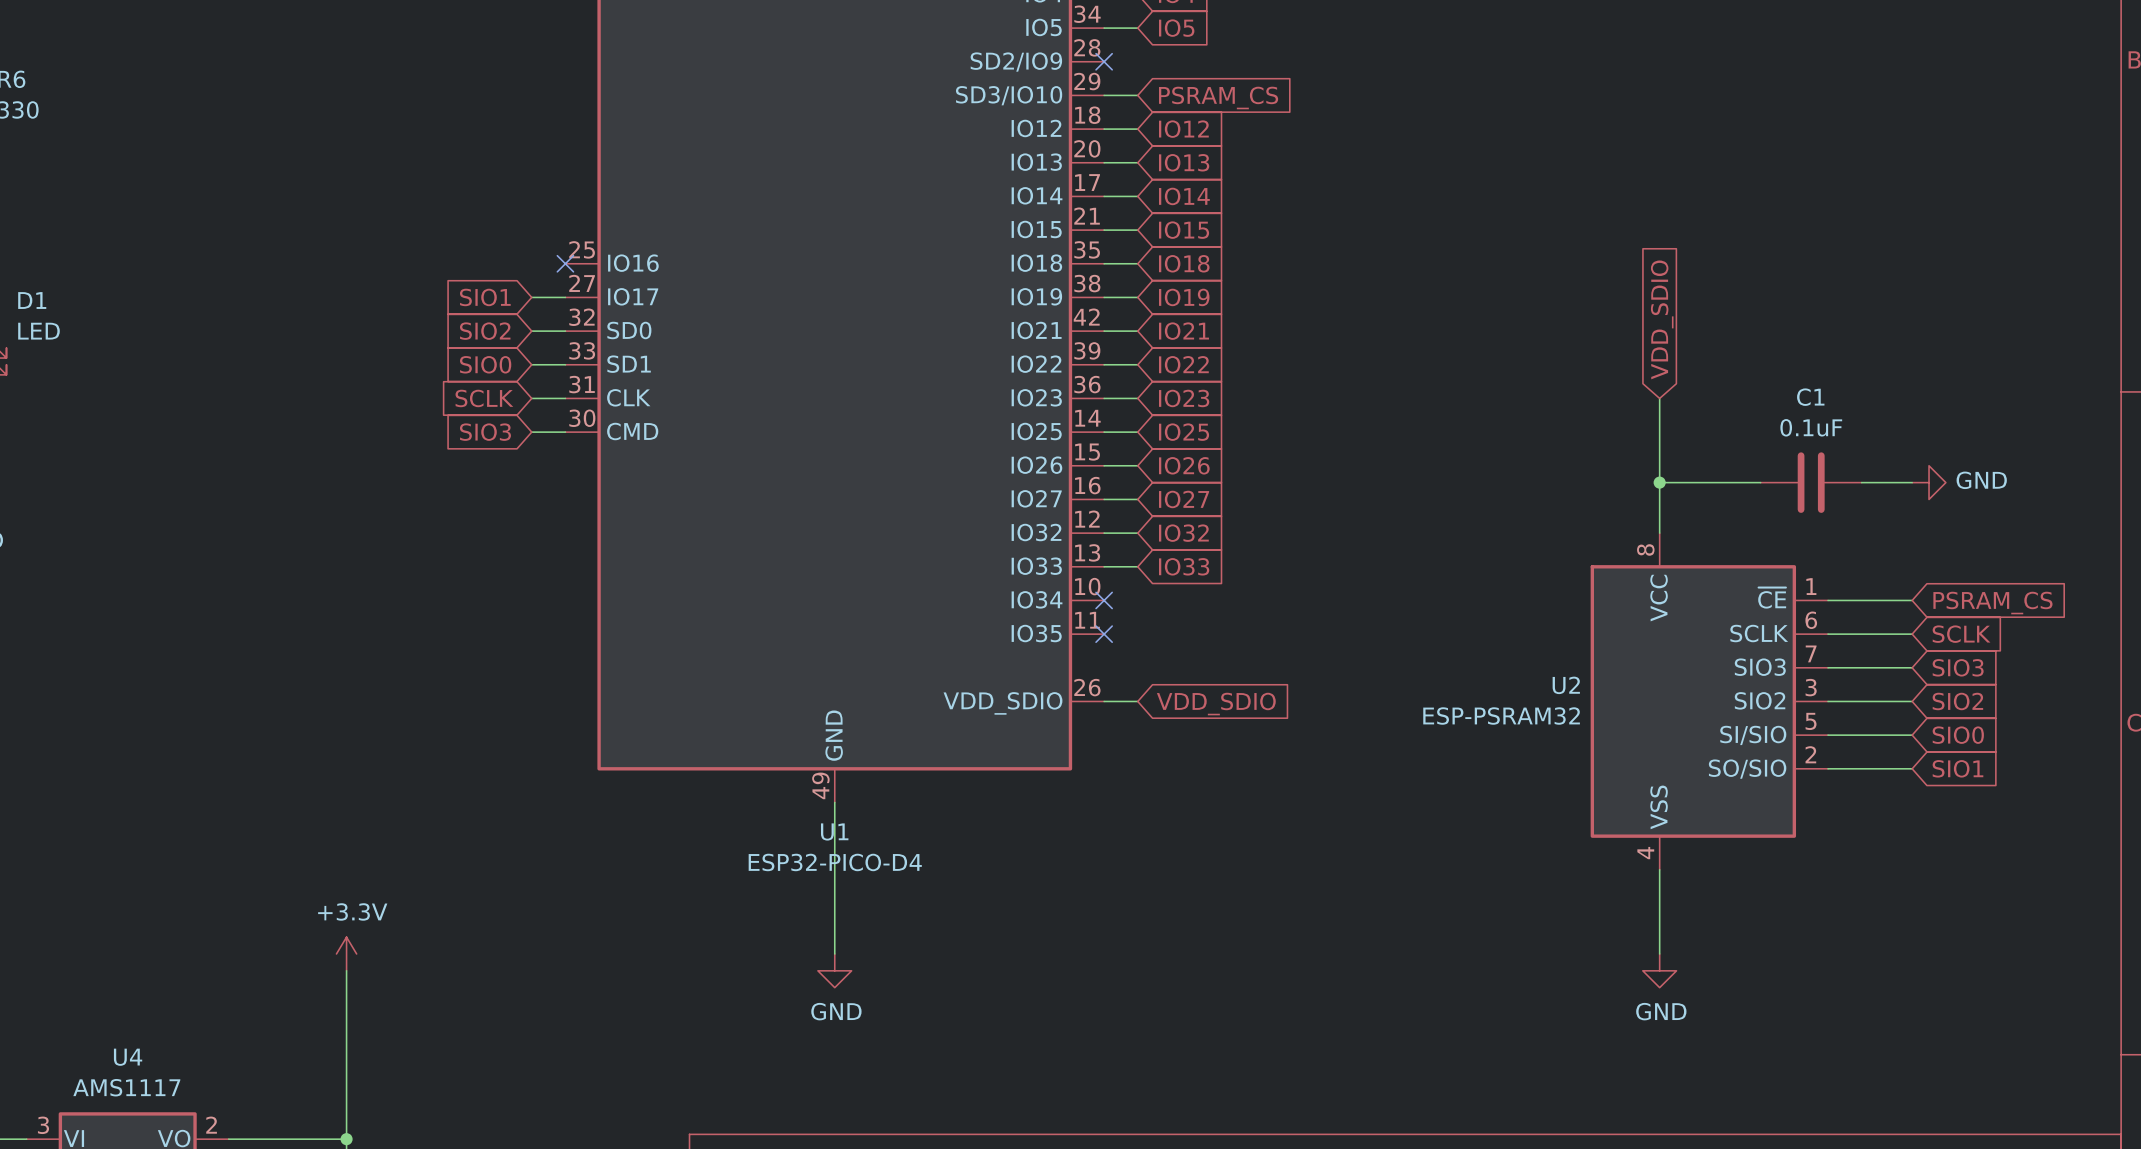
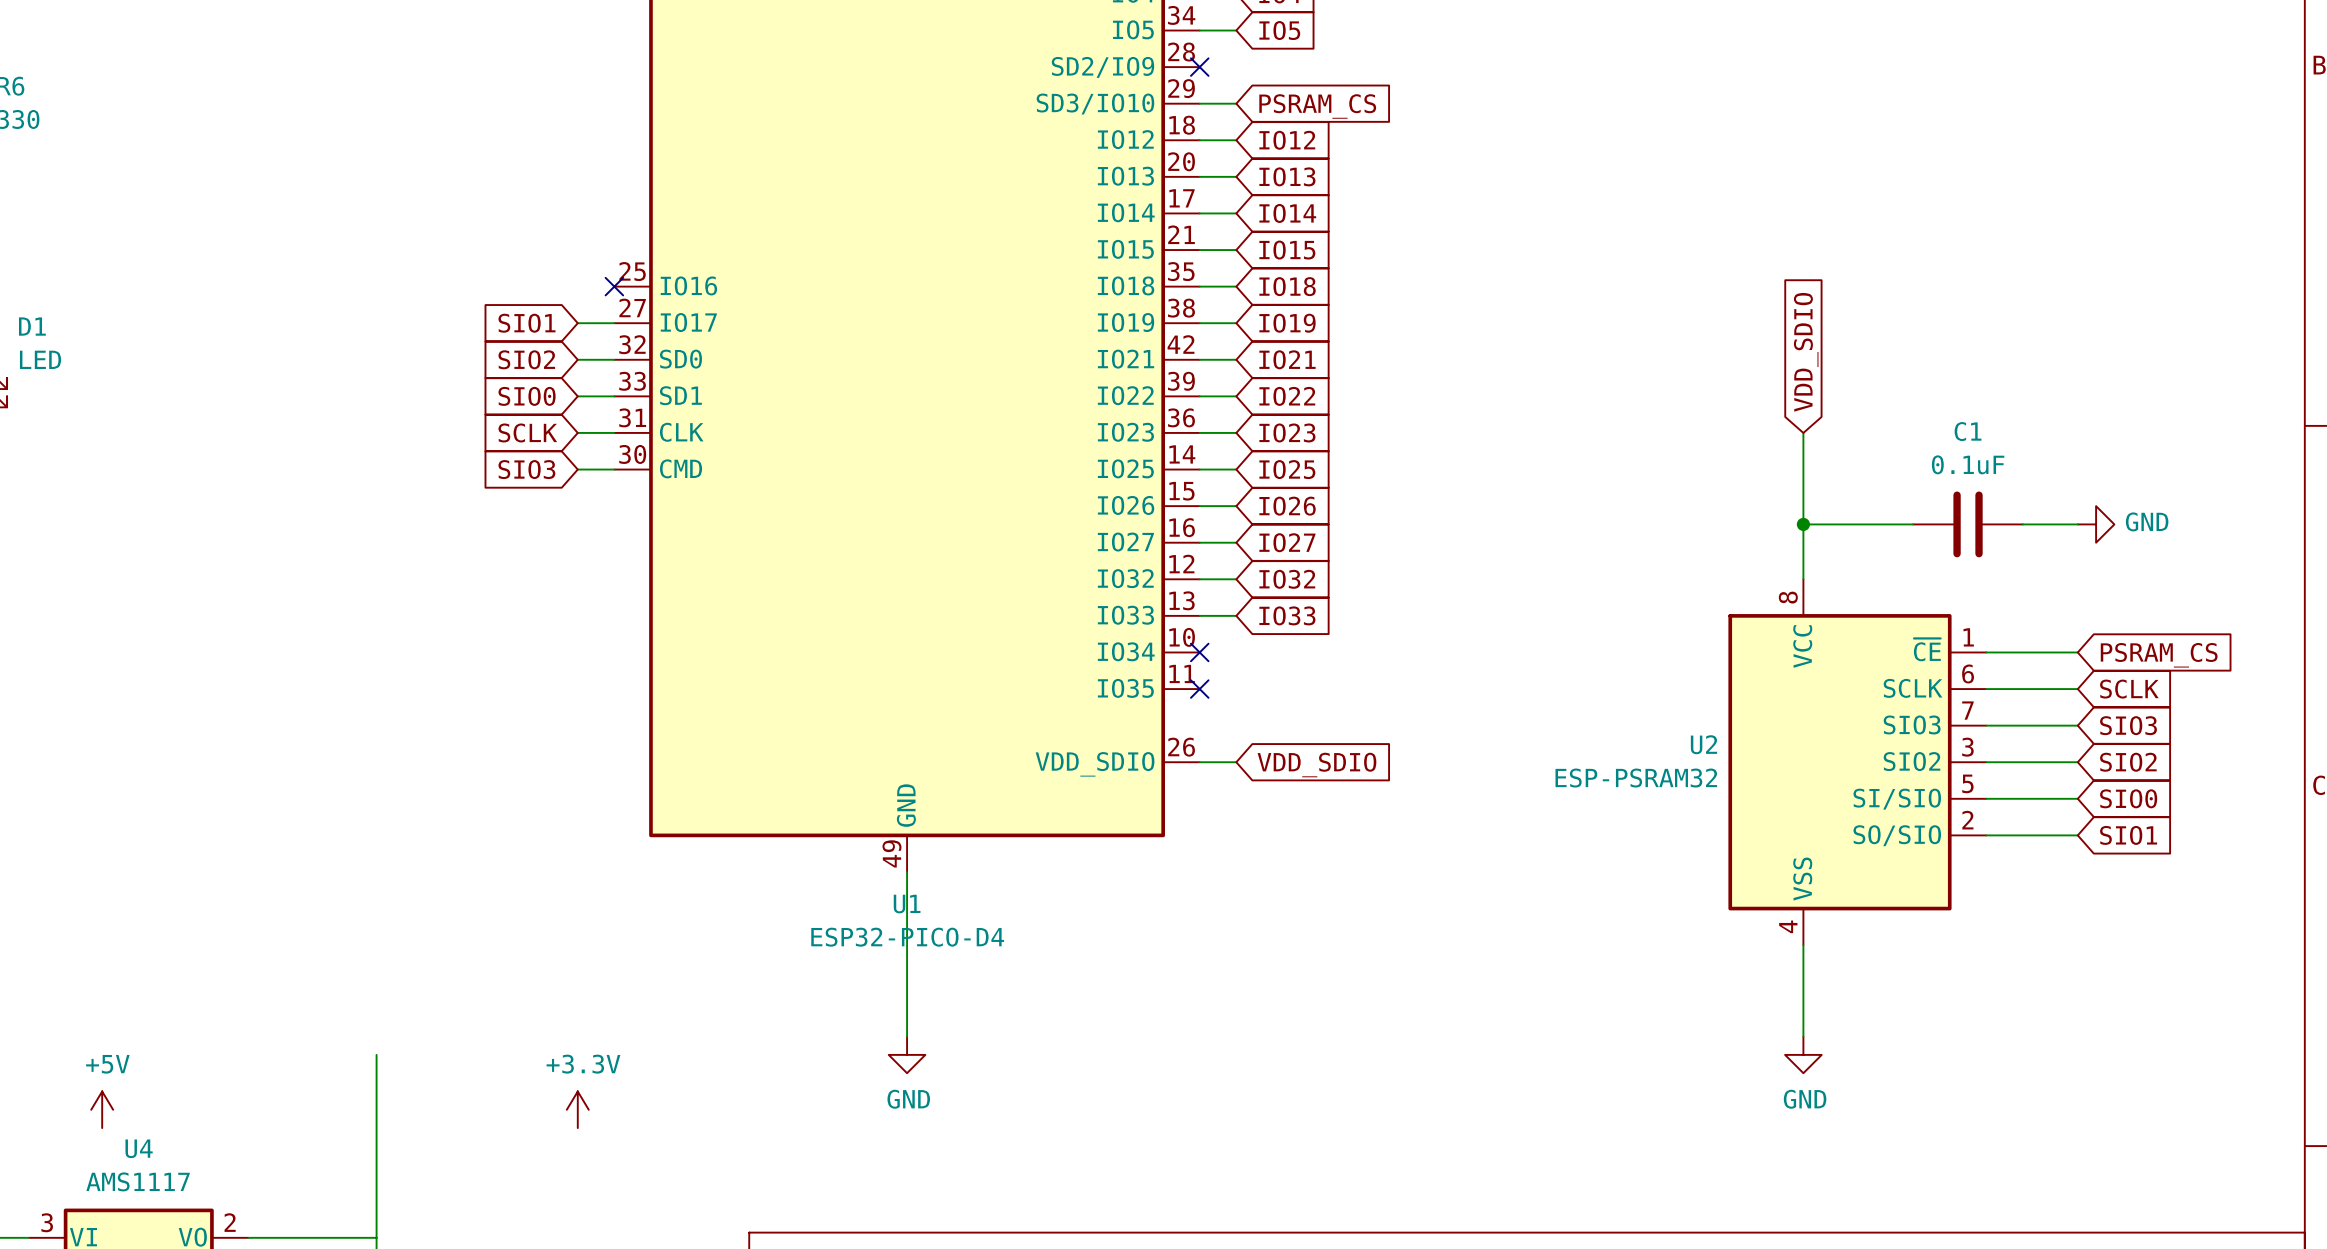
power symbol position: +3.3V (346, 953) -> +3.3V (577, 1109)
power symbol: none -> +5V (102, 1109)
junction: (346, 1139) -> none

